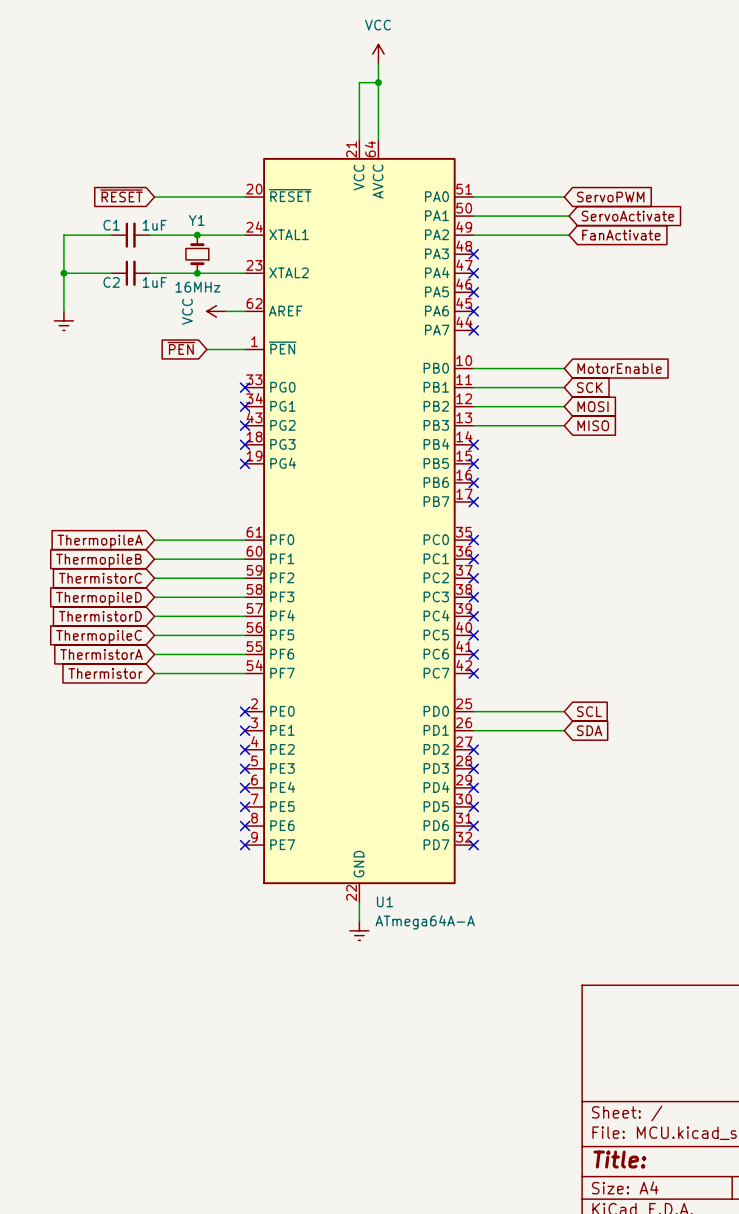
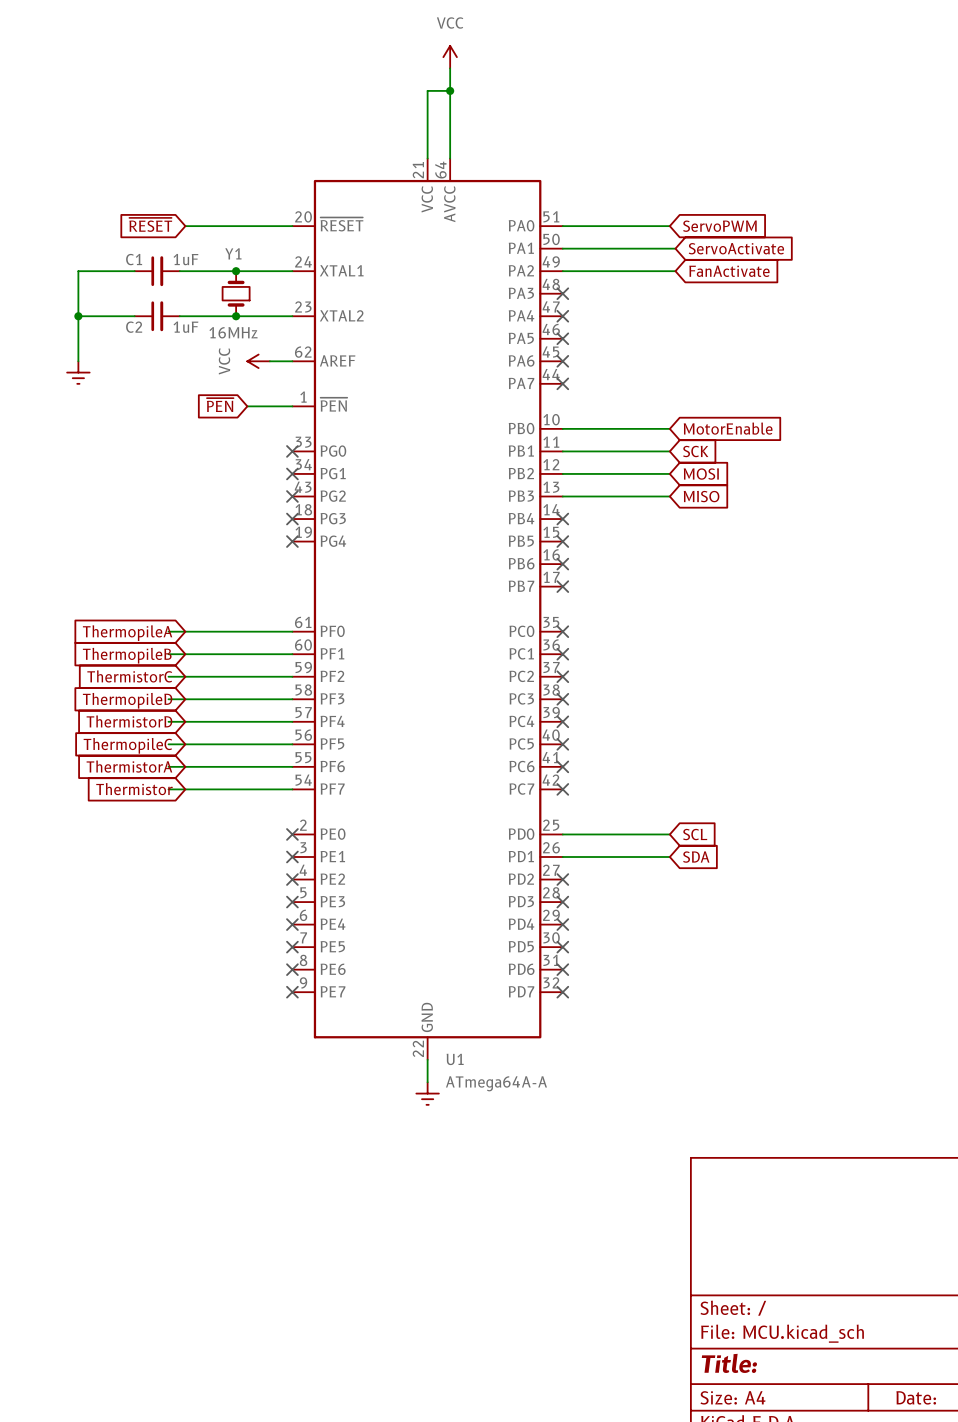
wire: none -> (168, 631) (185, 631)
wire: none -> (168, 654) (185, 654)
wire: none -> (168, 676) (185, 676)
wire: none -> (168, 699) (185, 699)
wire: none -> (168, 721) (185, 721)
wire: none -> (168, 744) (185, 744)
wire: none -> (168, 766) (185, 766)
wire: none -> (168, 789) (185, 789)

